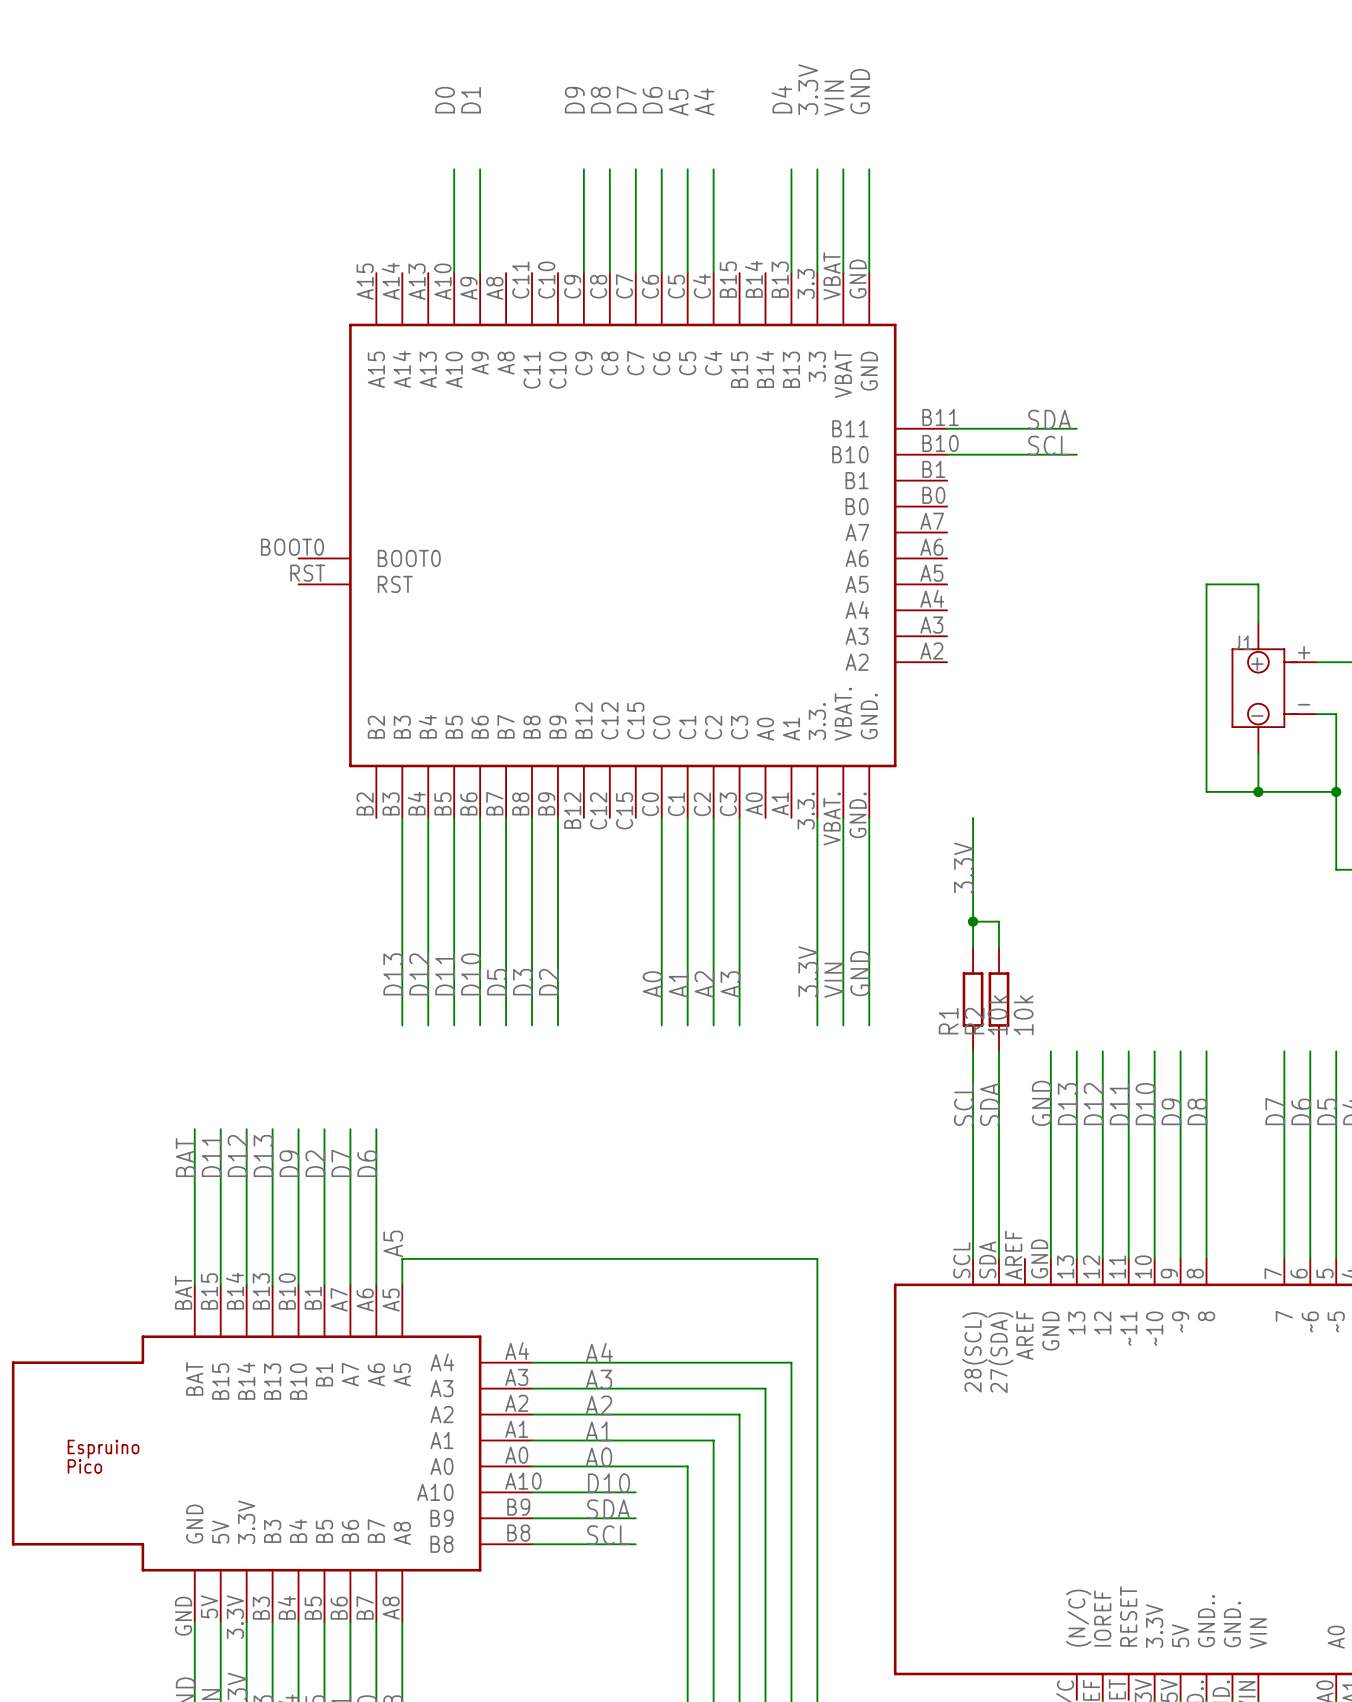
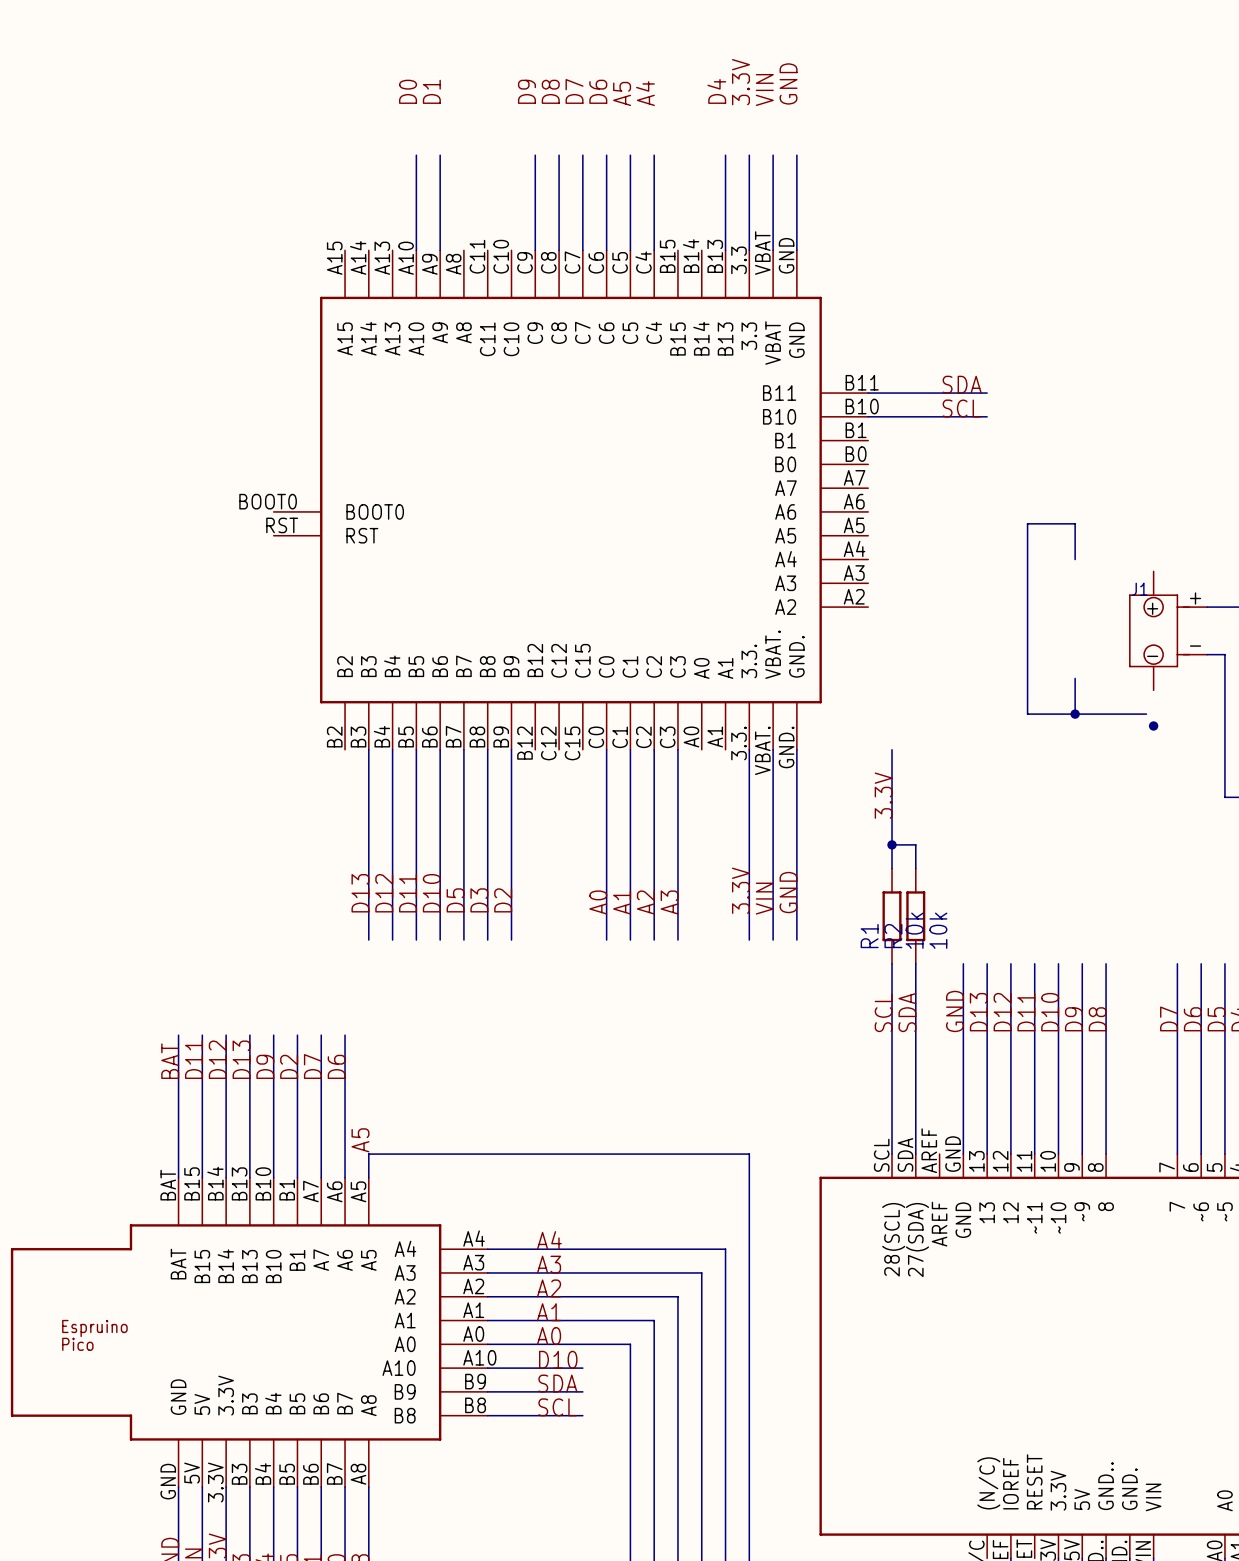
wire: (1258, 623) (1258, 584) (1206, 584) (1206, 791) (1336, 791) -> (1075, 559) (1075, 523) (1027, 523) (1027, 714) (1146, 714)
wire: (1258, 753) (1258, 791) -> (1075, 678) (1075, 714)
junction: none -> (1075, 714)
junction: (1336, 791) -> none

